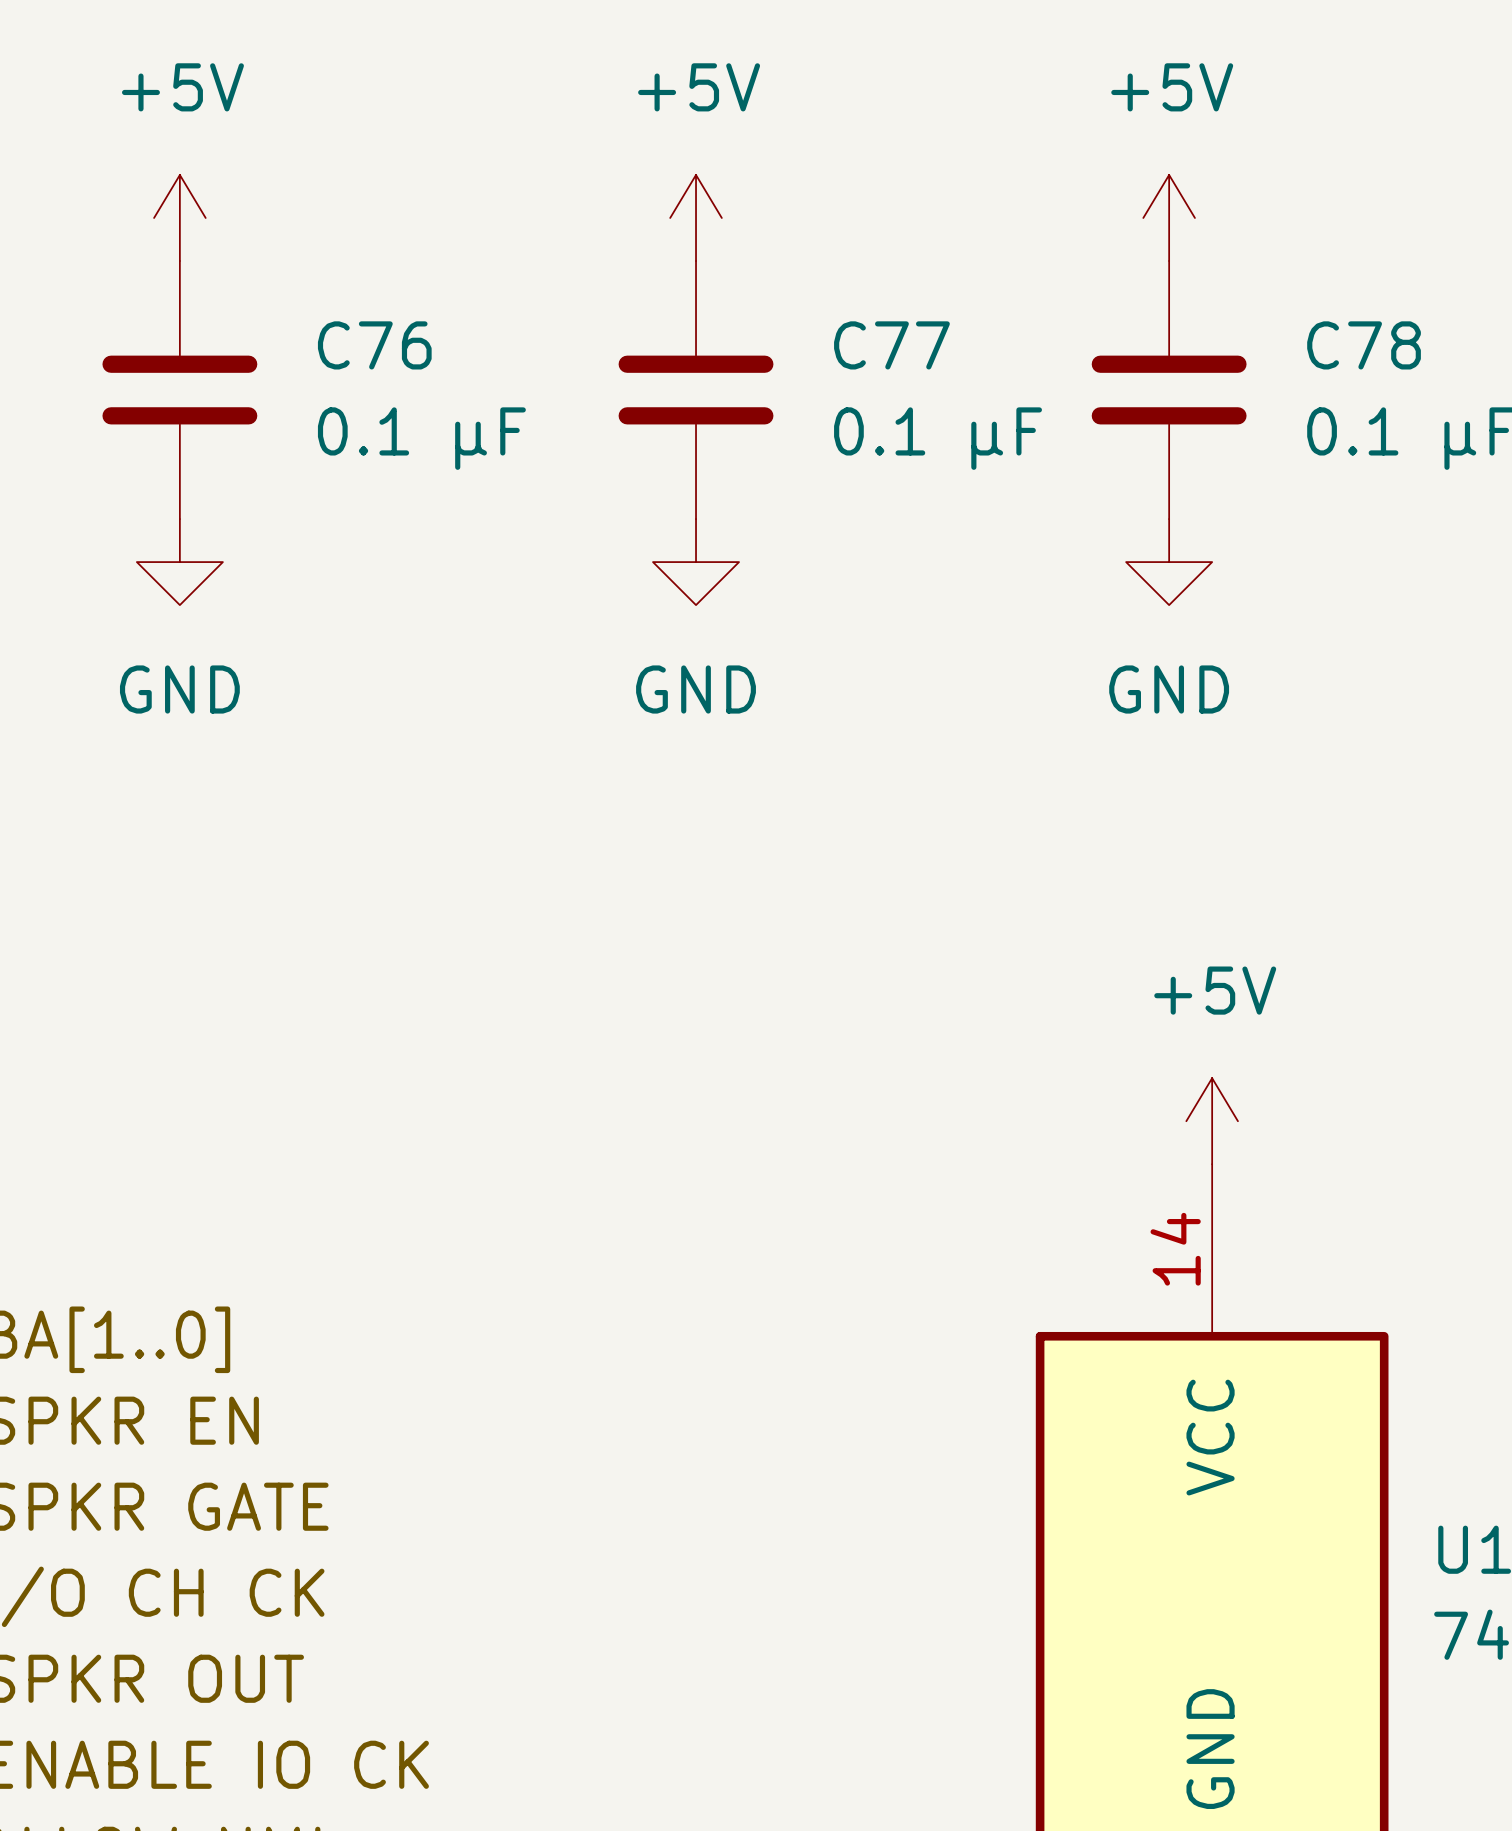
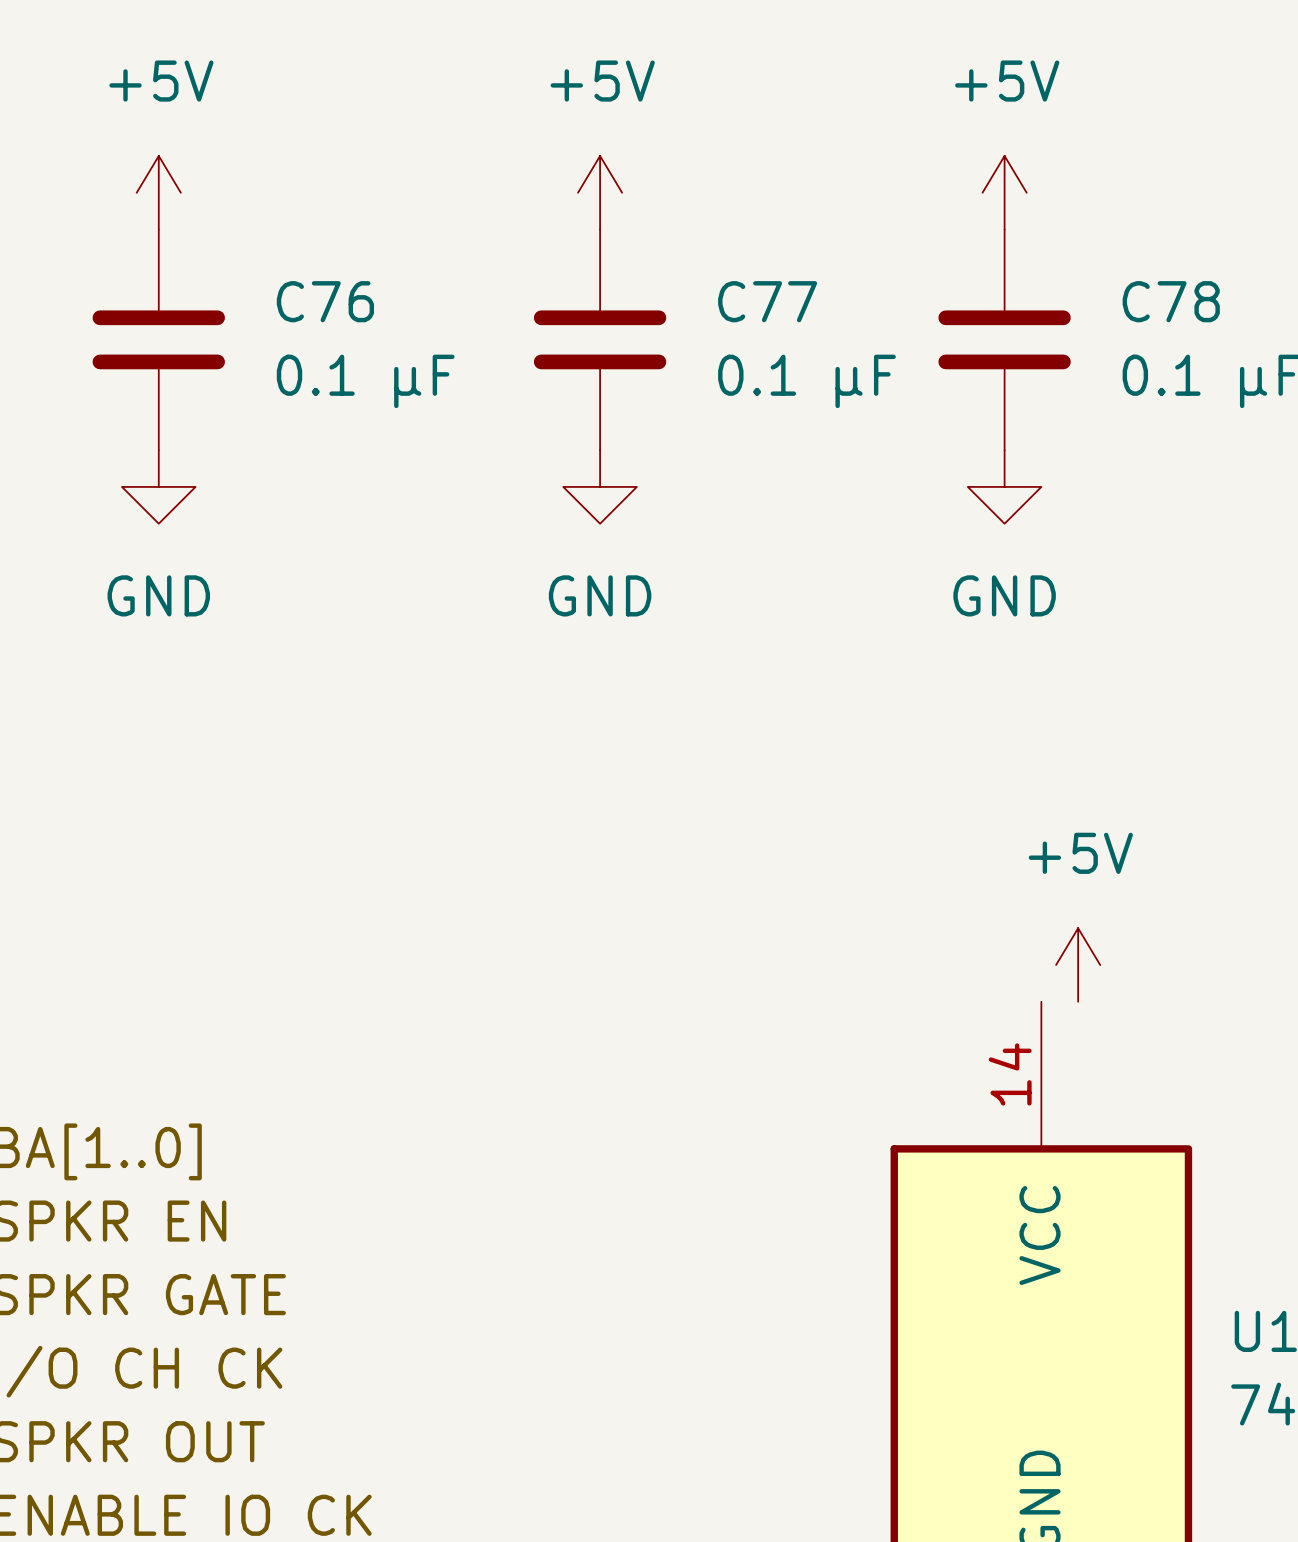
power symbol position: +5V (1212, 1121) -> +5V (1078, 965)

